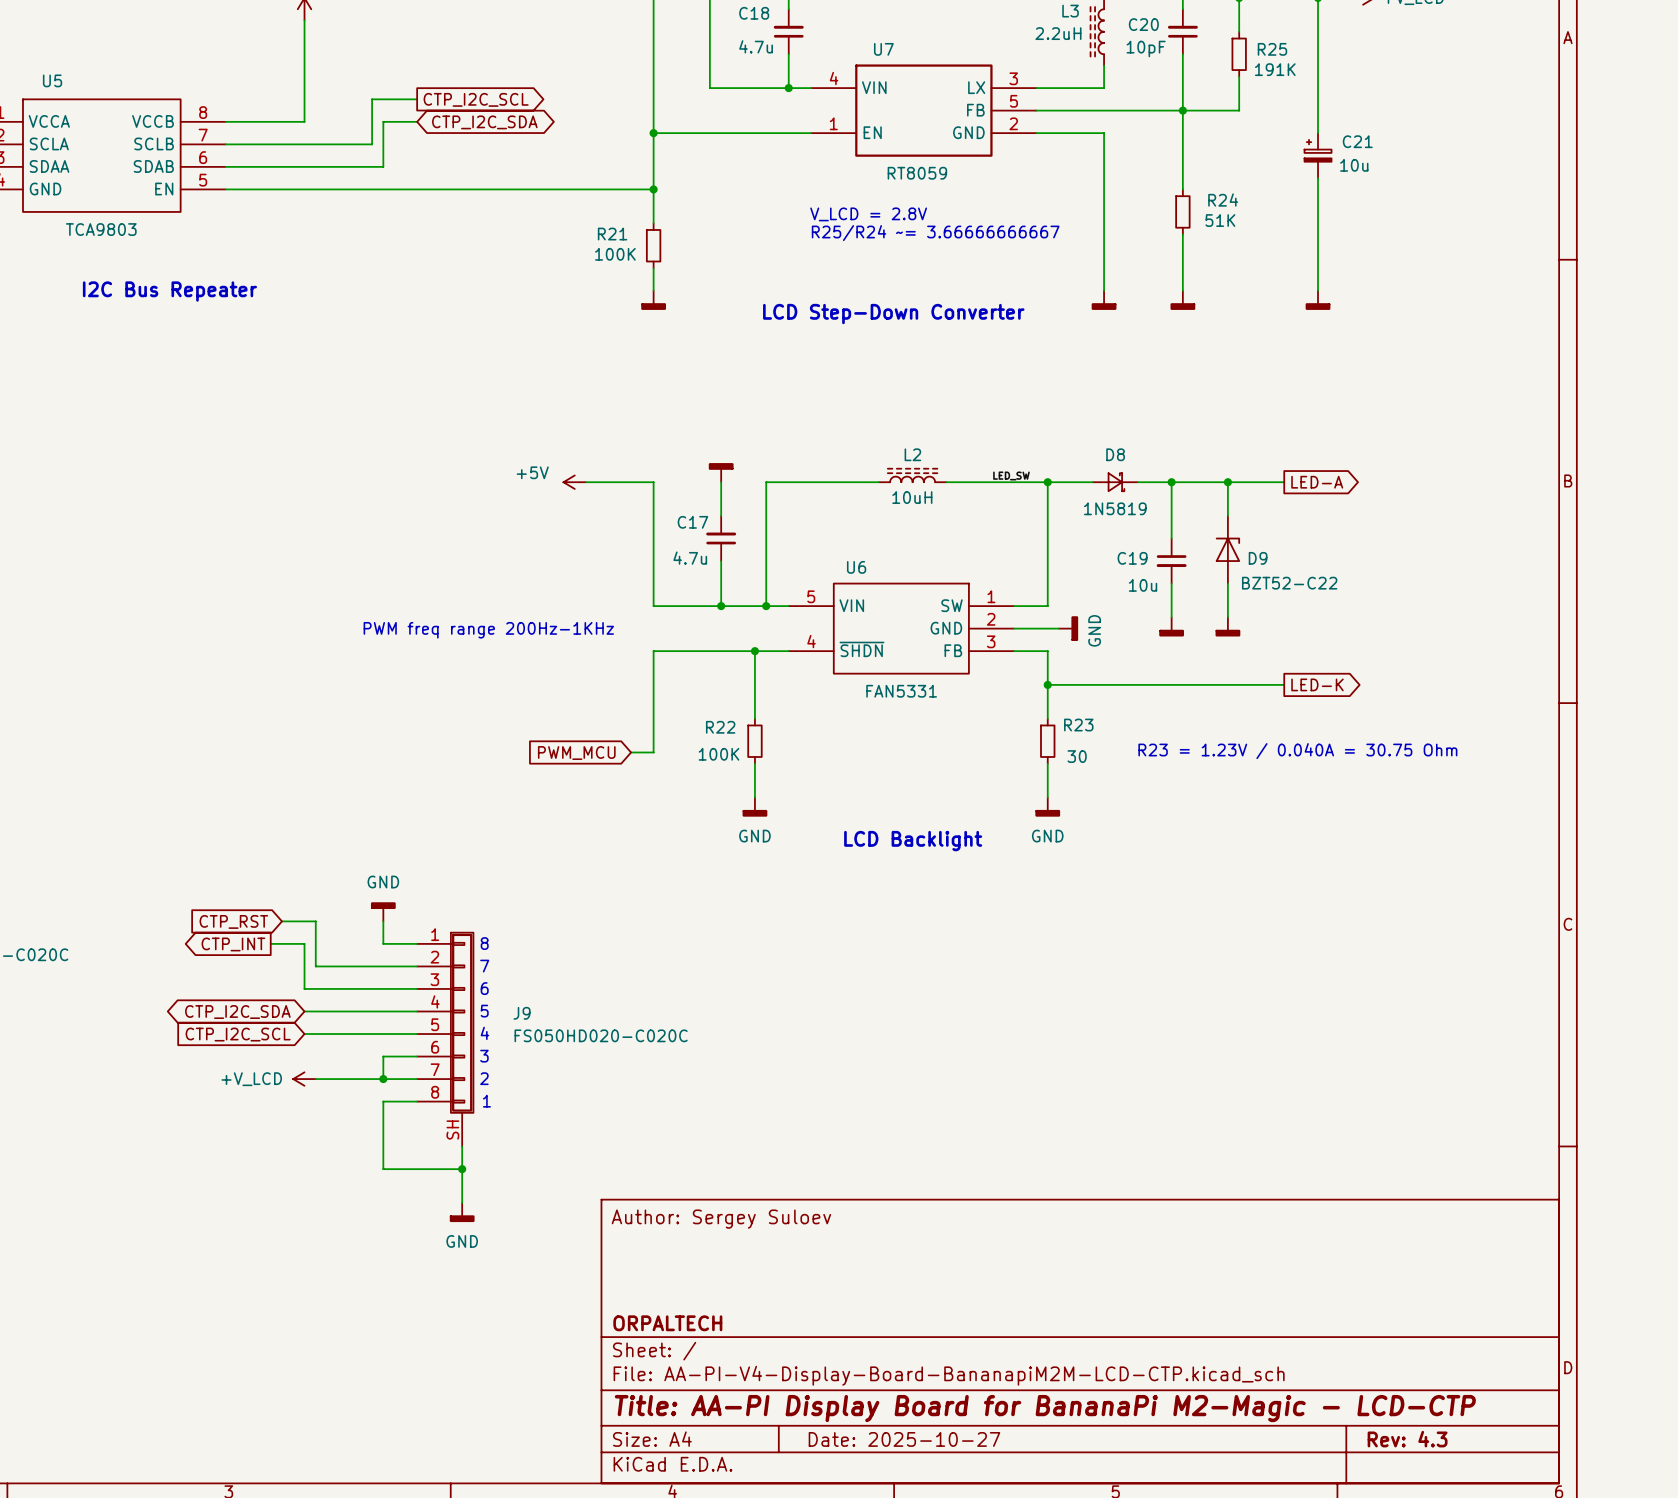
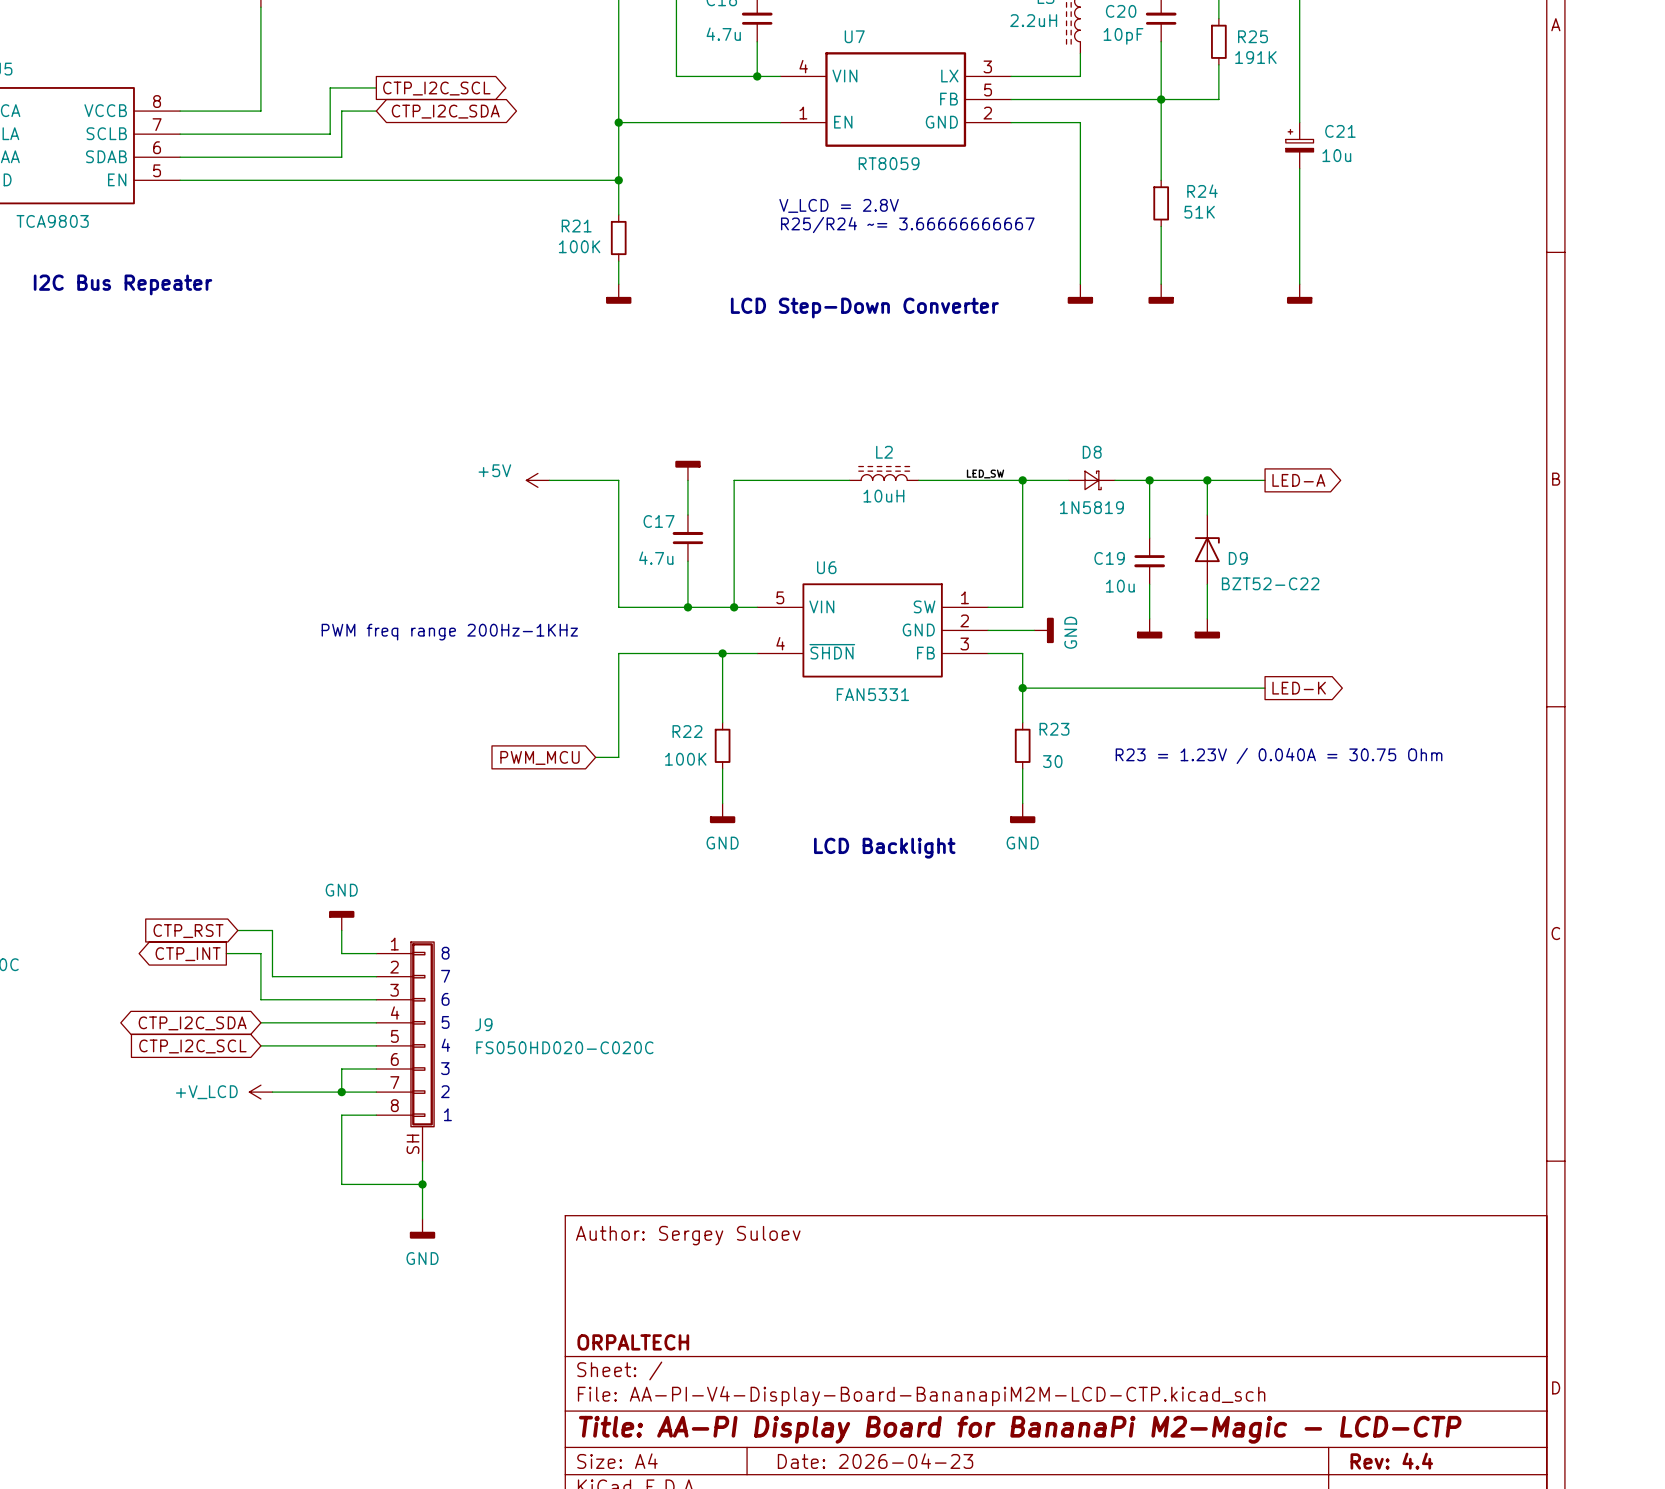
title block: Date: 2025-10-27 (904, 1439) -> Date: 2026-04-23 (875, 1461)
title block: Rev: 4.3 (1407, 1439) -> Rev: 4.4 (1391, 1461)

